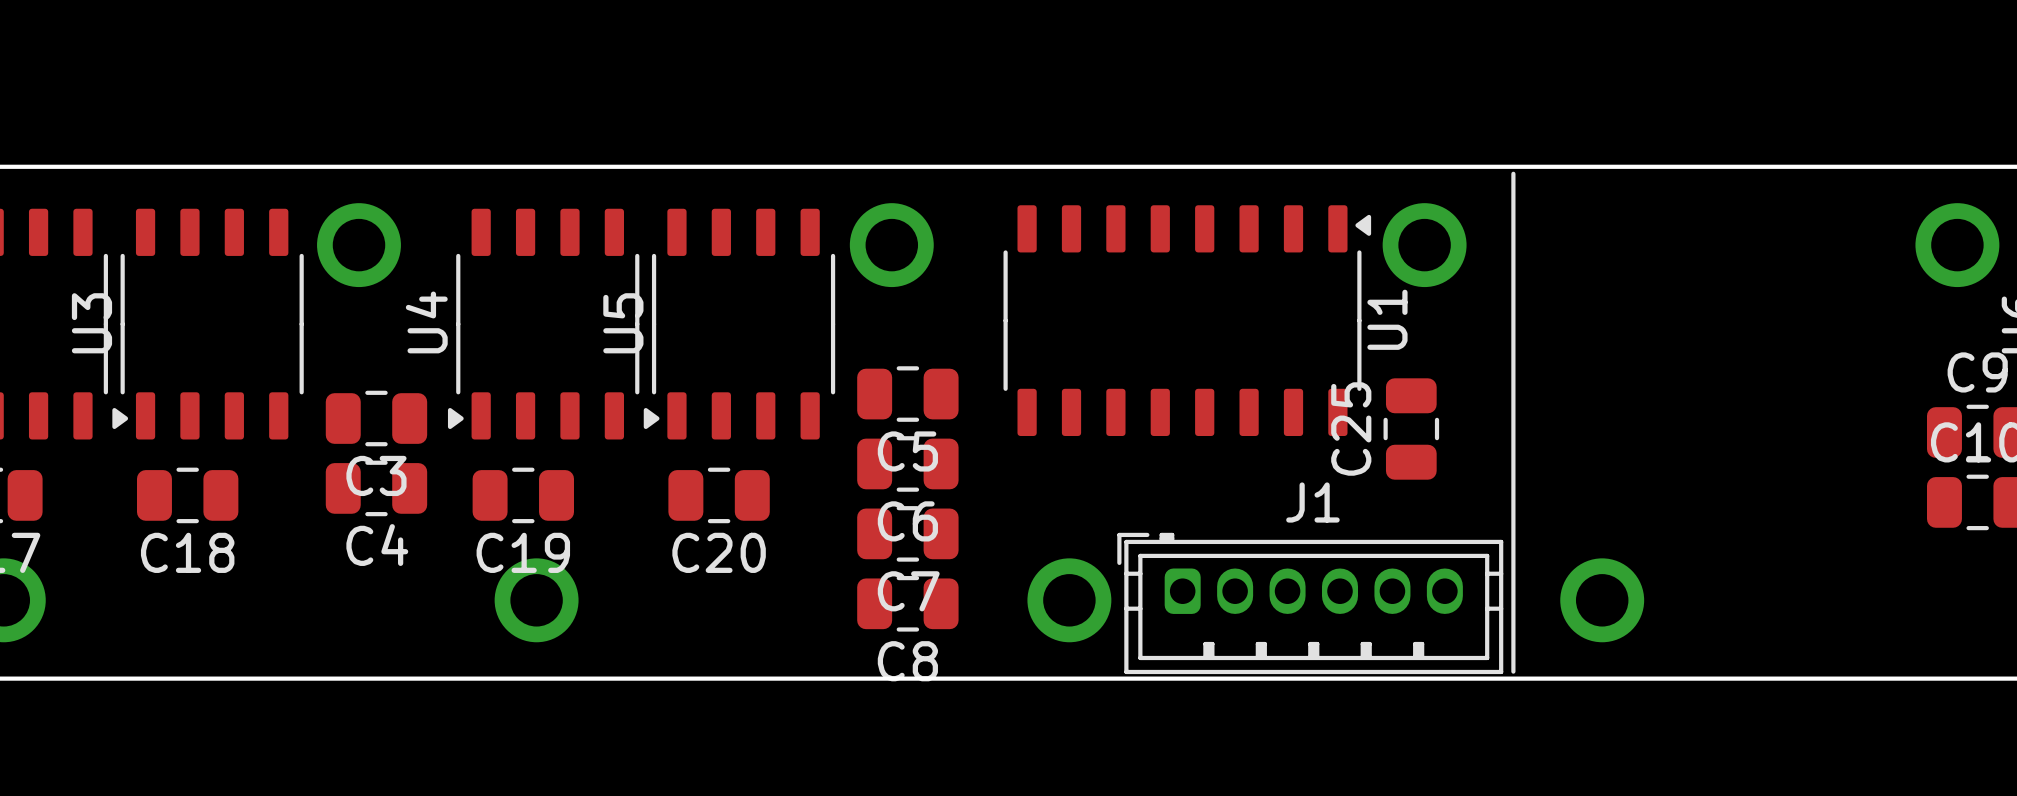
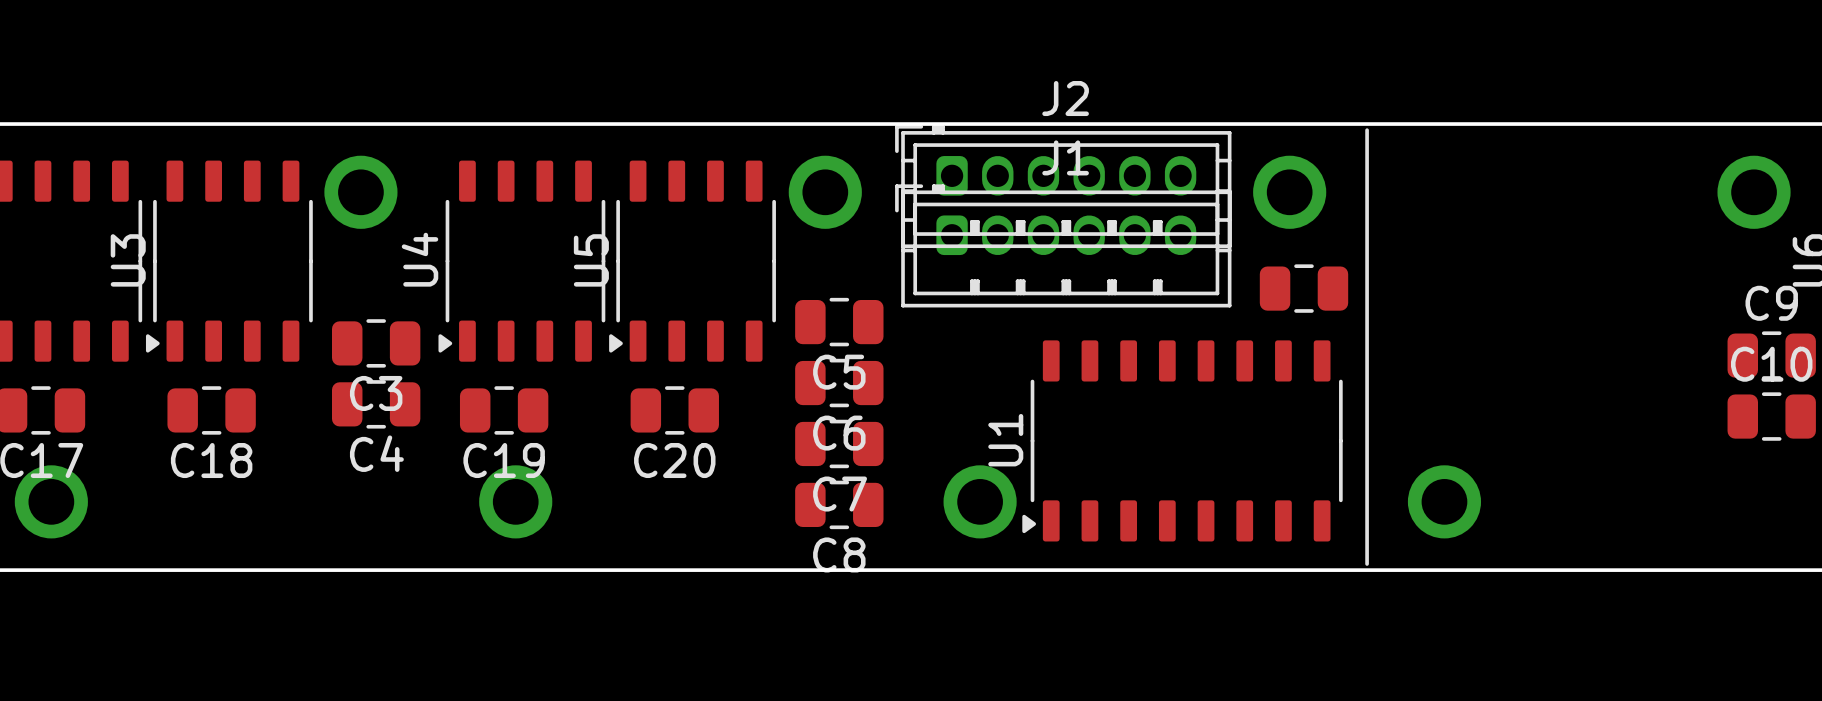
J2: none -> (1063, 186)
U1 rotation: 0° (1187, 320) -> 180° (1182, 440)
U1 position: (1187, 320) -> (1182, 440)
part: none -> (1303, 288)
C25: (1411, 429) -> none
J1 position: (1310, 603) -> (1063, 245)

